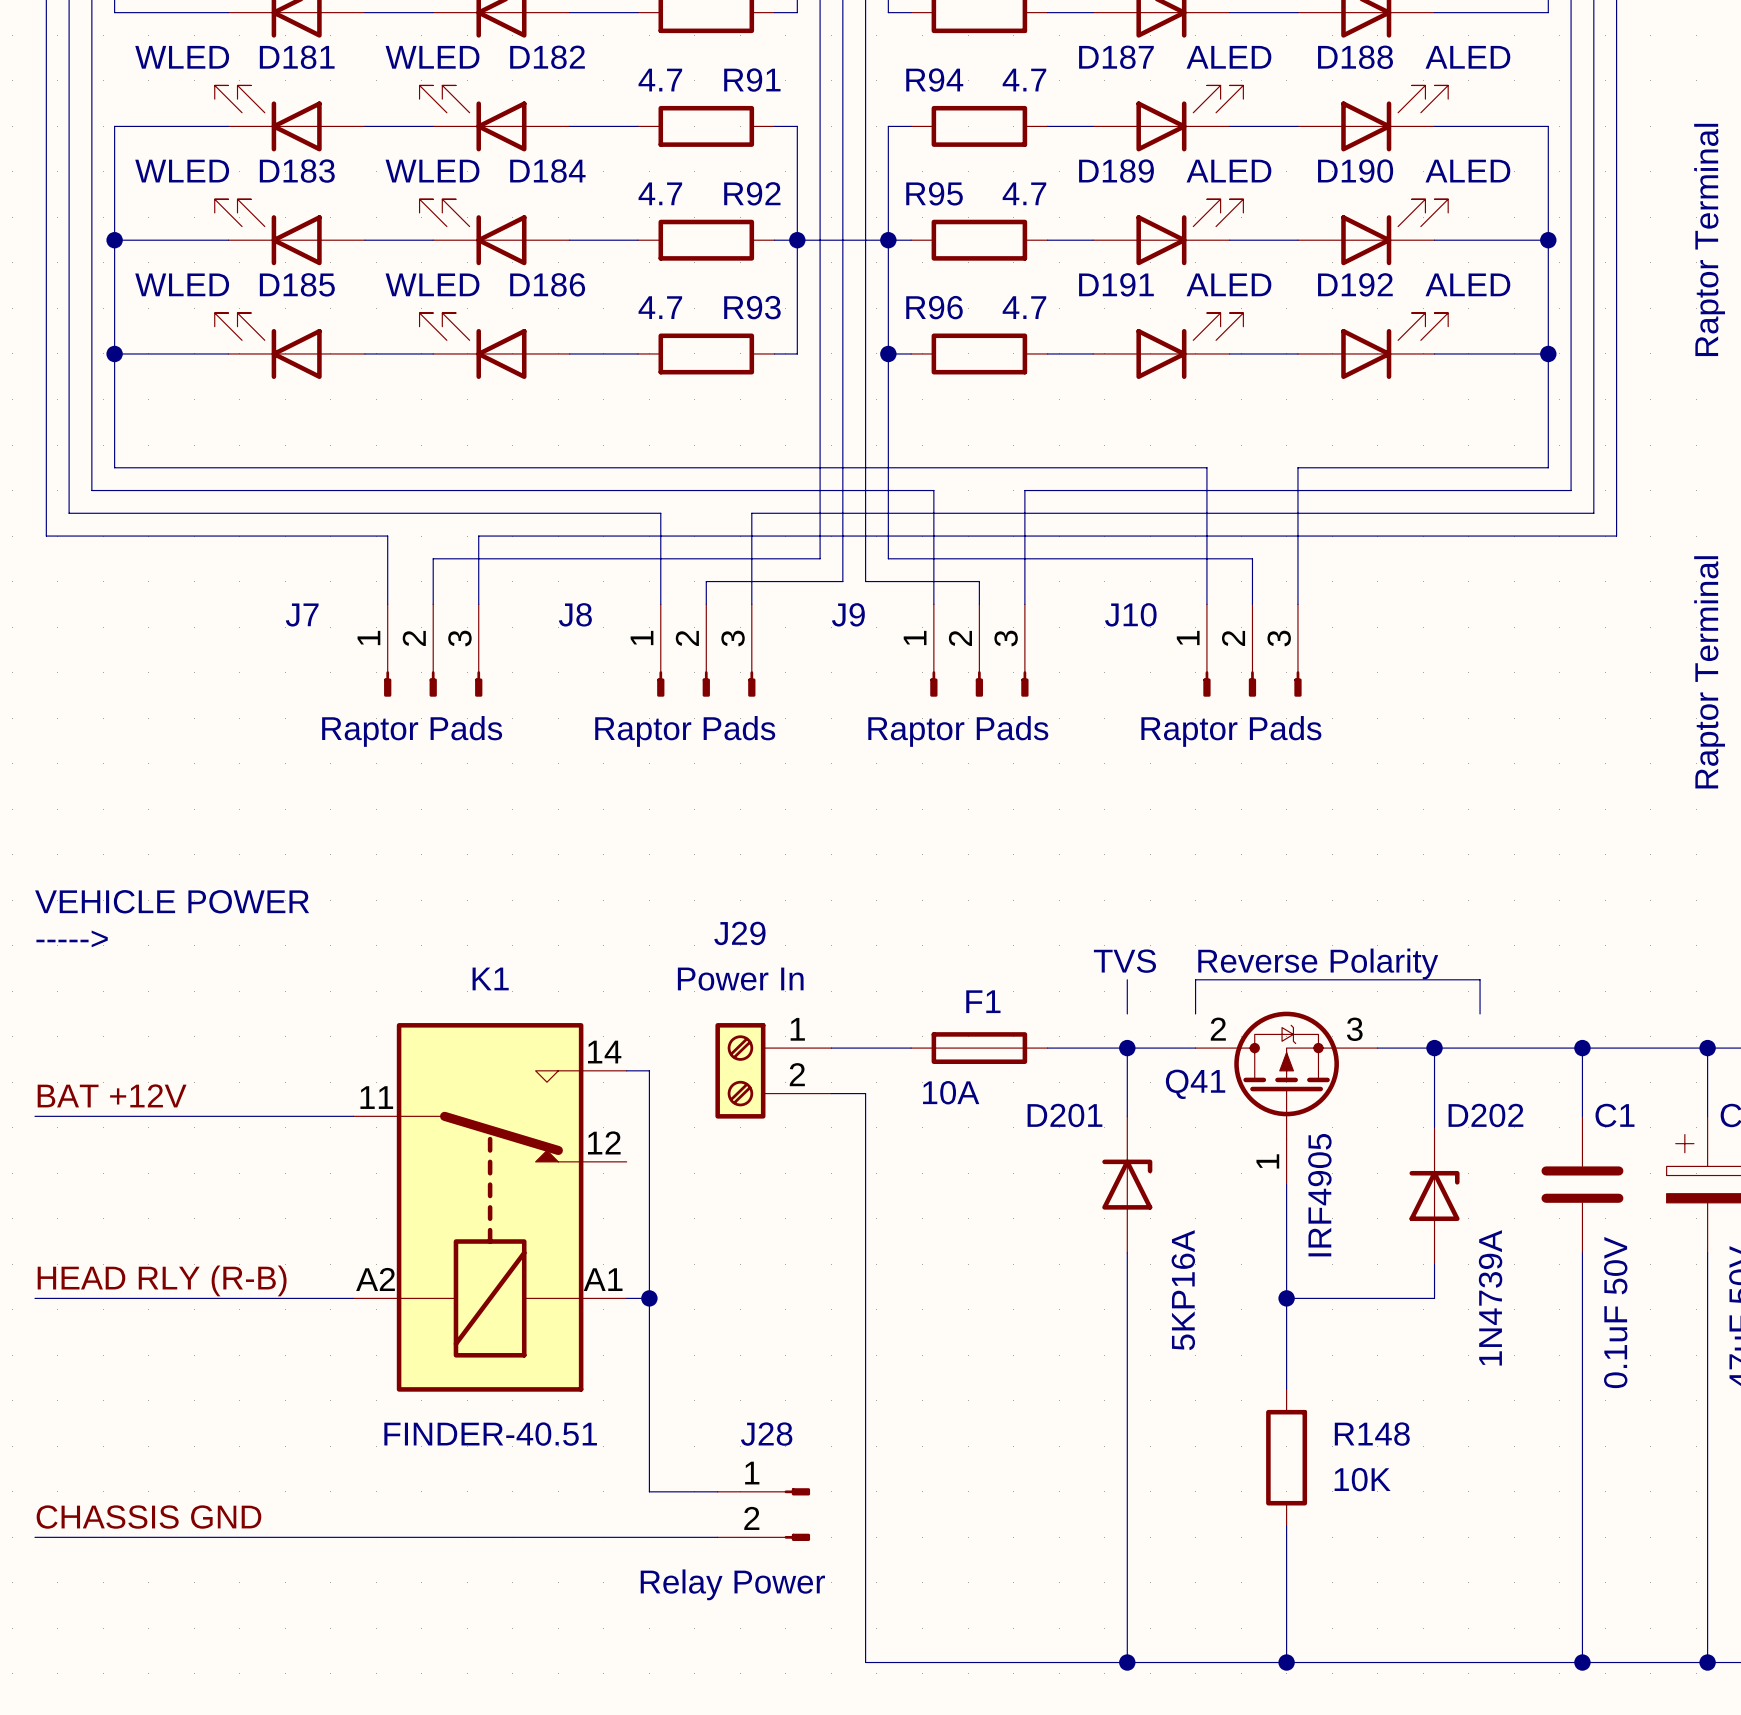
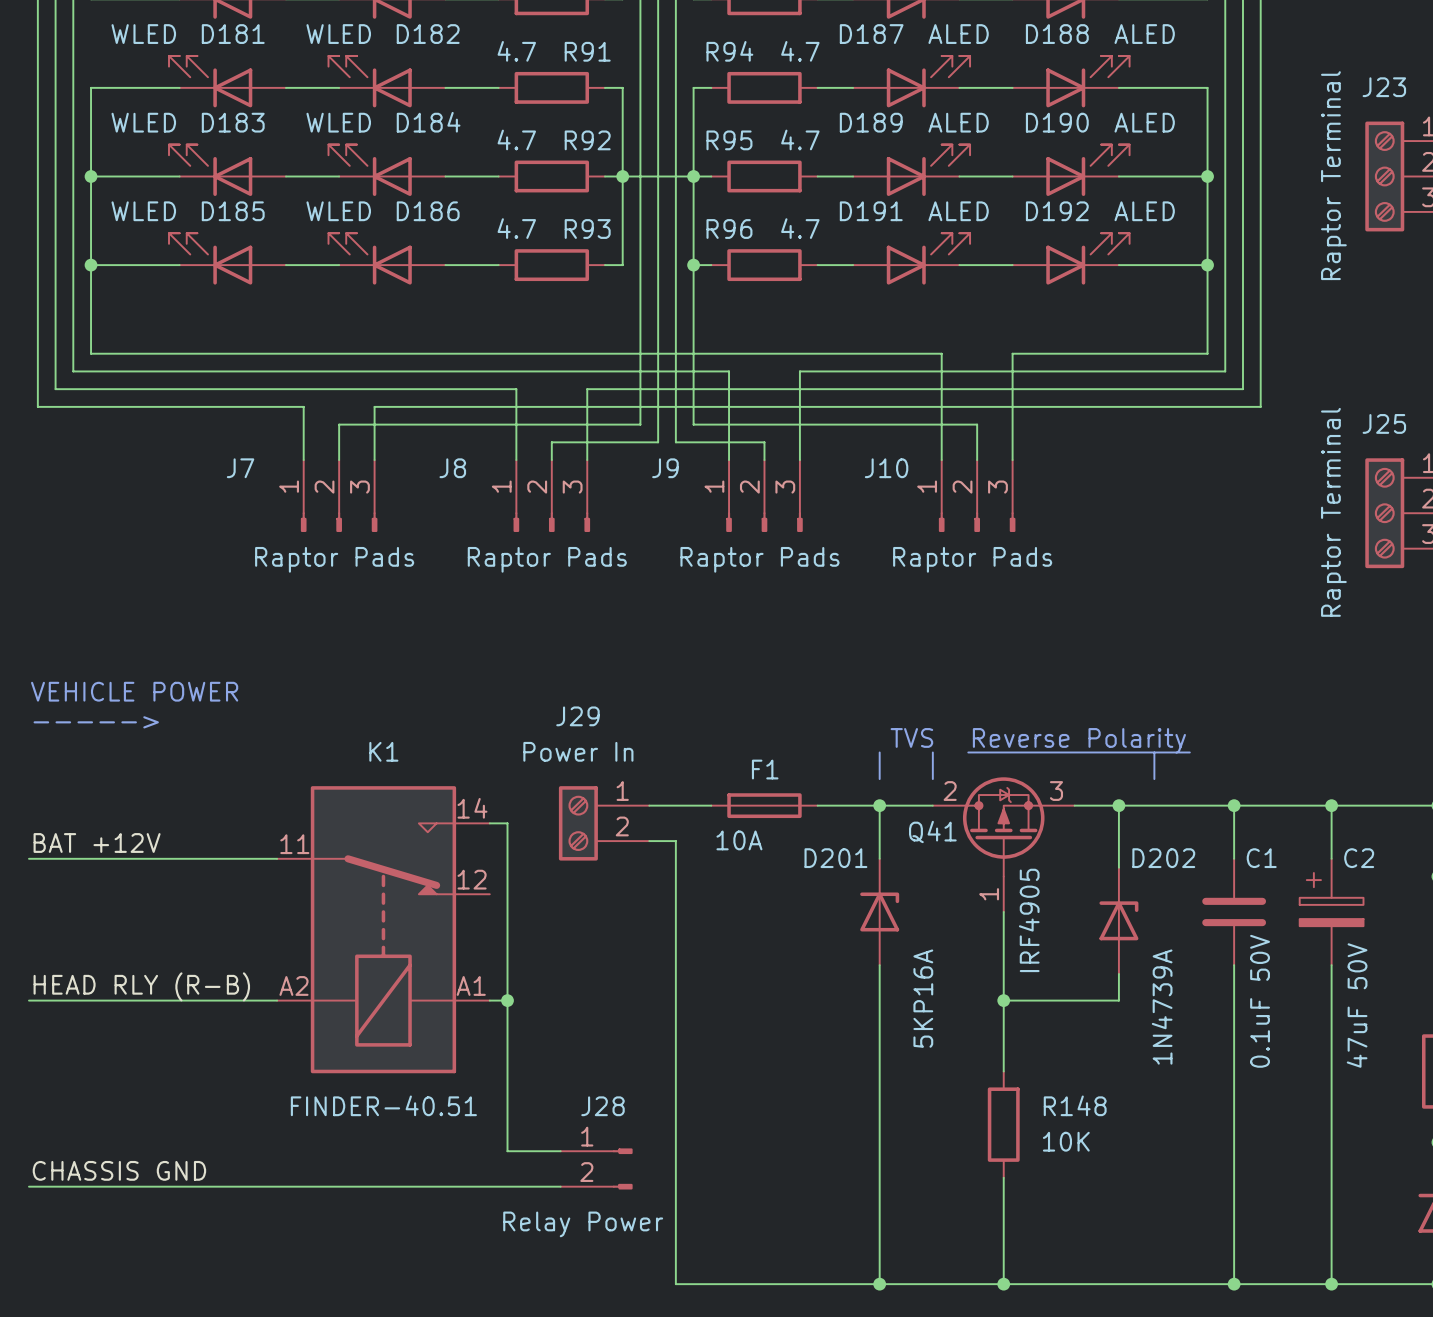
text position: TVS (1124, 961) -> TVS (911, 737)
text position: Reverse Polarity (1318, 963) -> Reverse Polarity (1079, 740)
line: (1195, 979) (1241, 979) -> (1154, 752) (1189, 752)

